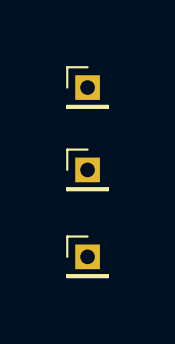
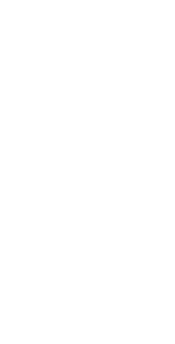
part: (87, 87) -> none
part: (87, 169) -> none
part: (87, 256) -> none

